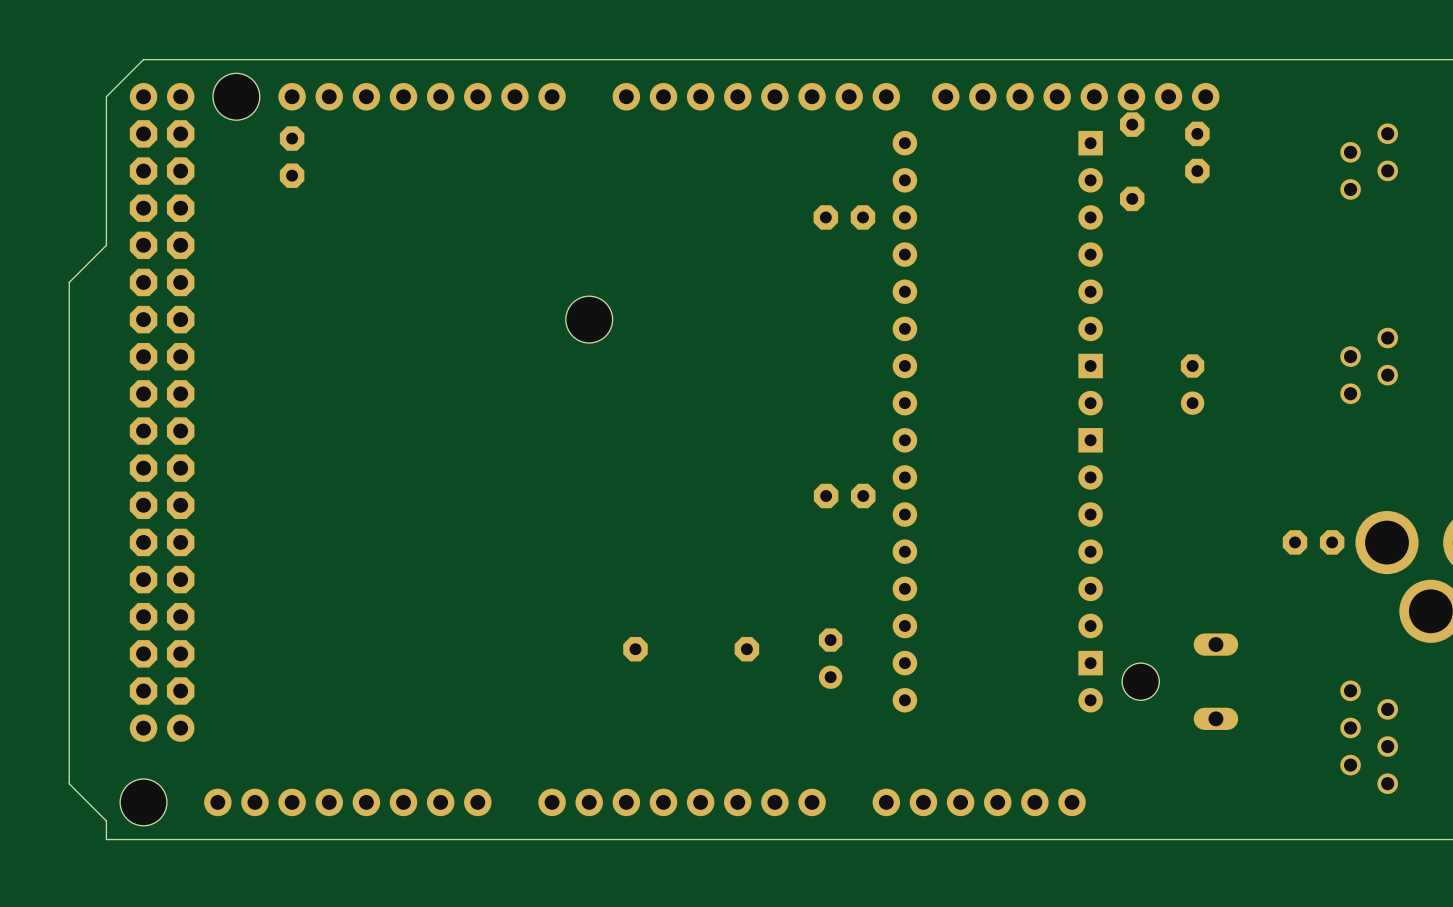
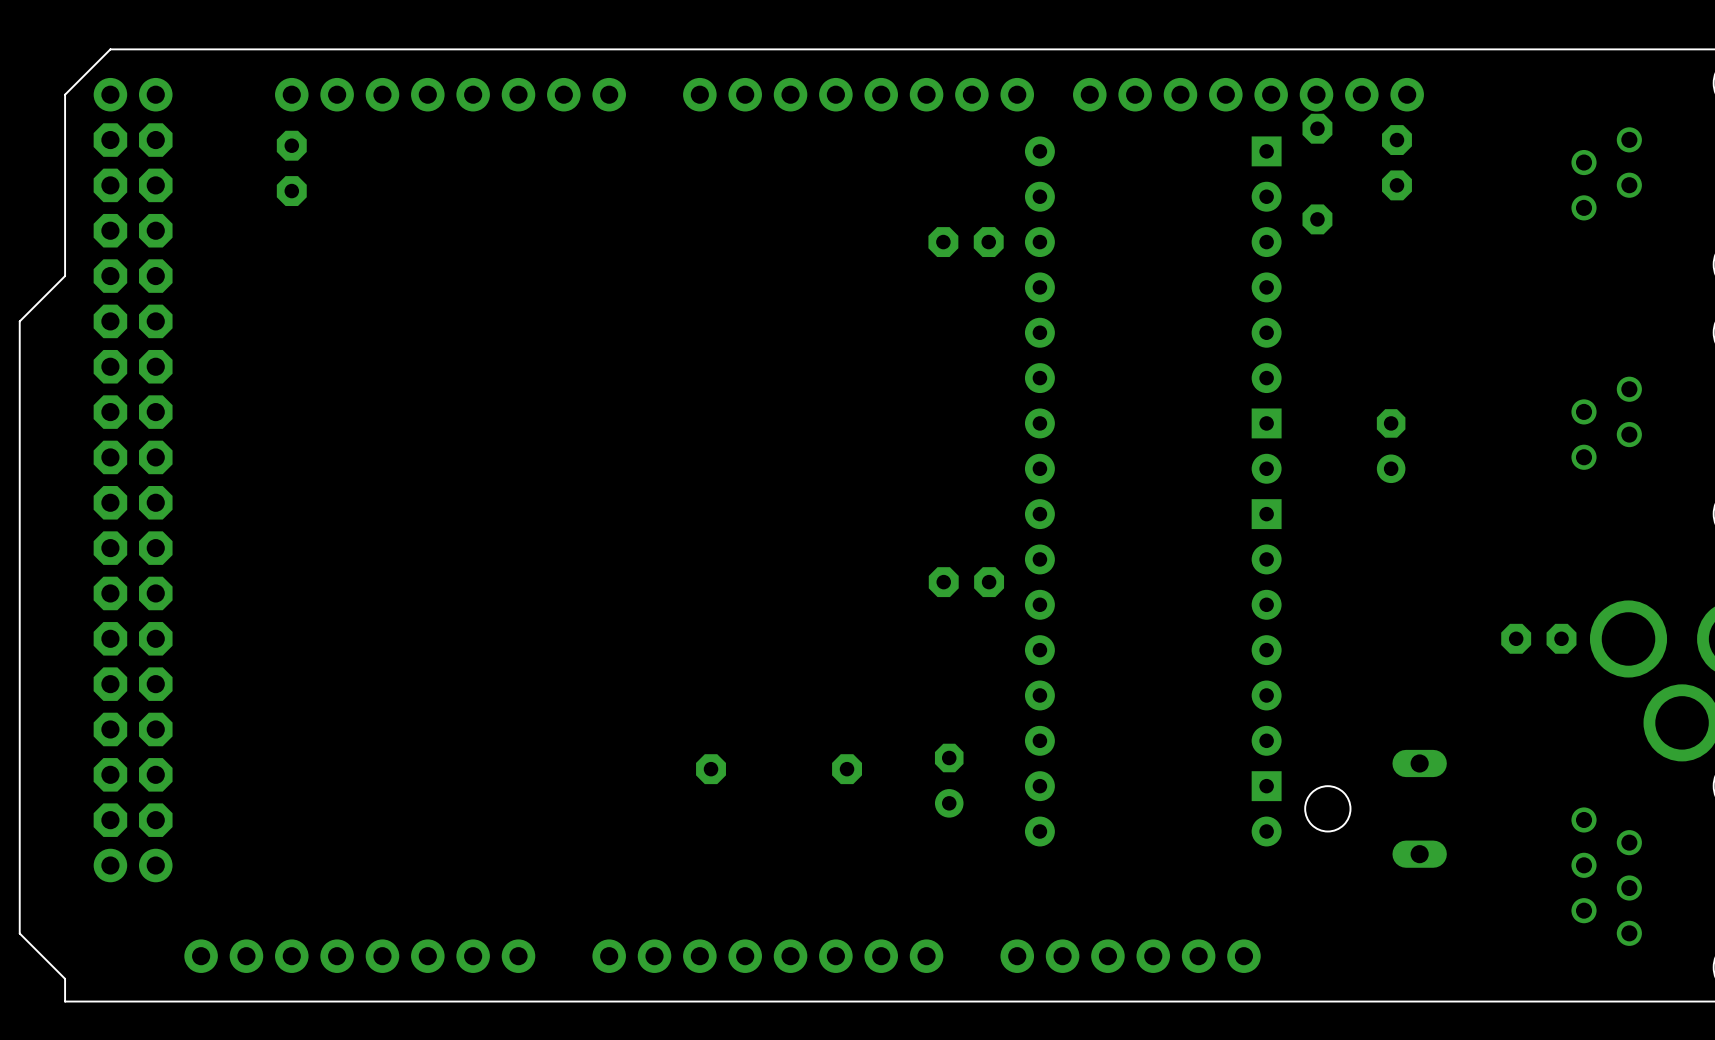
hole: (236, 96) -> none
hole: (589, 319) -> none
hole: (143, 802) -> none

